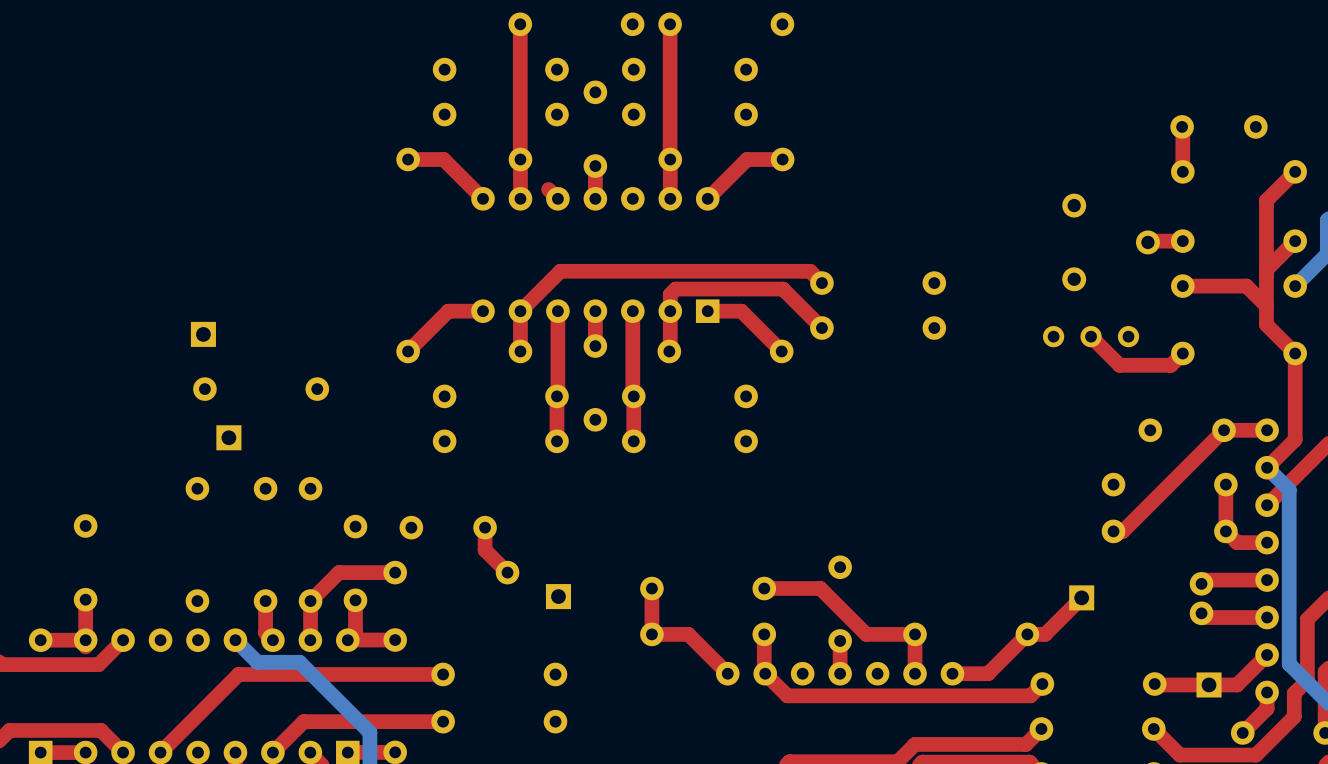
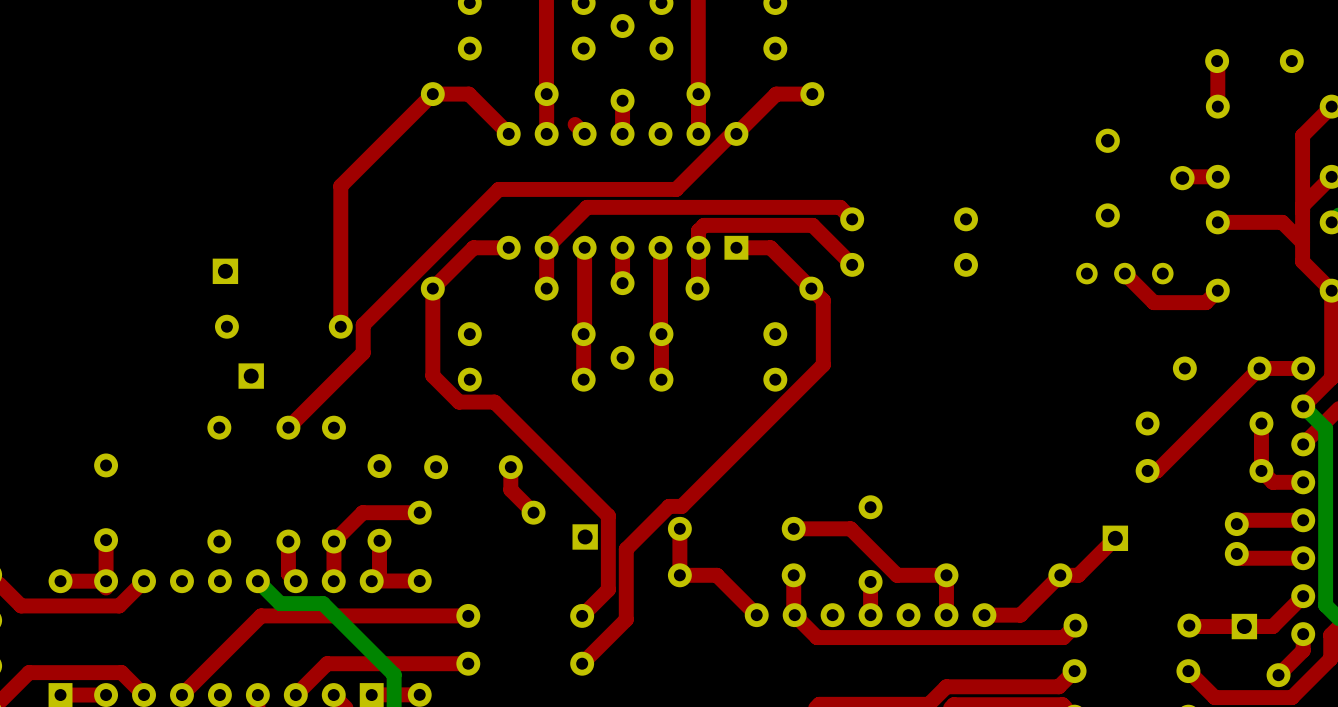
top track: none -> (432, 94) (340, 186) (340, 326)
top track: none -> (736, 133) (731, 133) (676, 189) (498, 189) (363, 325) (363, 352) (288, 427)
top track: none -> (432, 288) (432, 375) (459, 402) (494, 402) (608, 515) (608, 589) (582, 615)
top track: none -> (811, 288) (823, 300) (823, 364) (681, 506) (669, 506) (626, 549) (626, 619) (582, 663)

